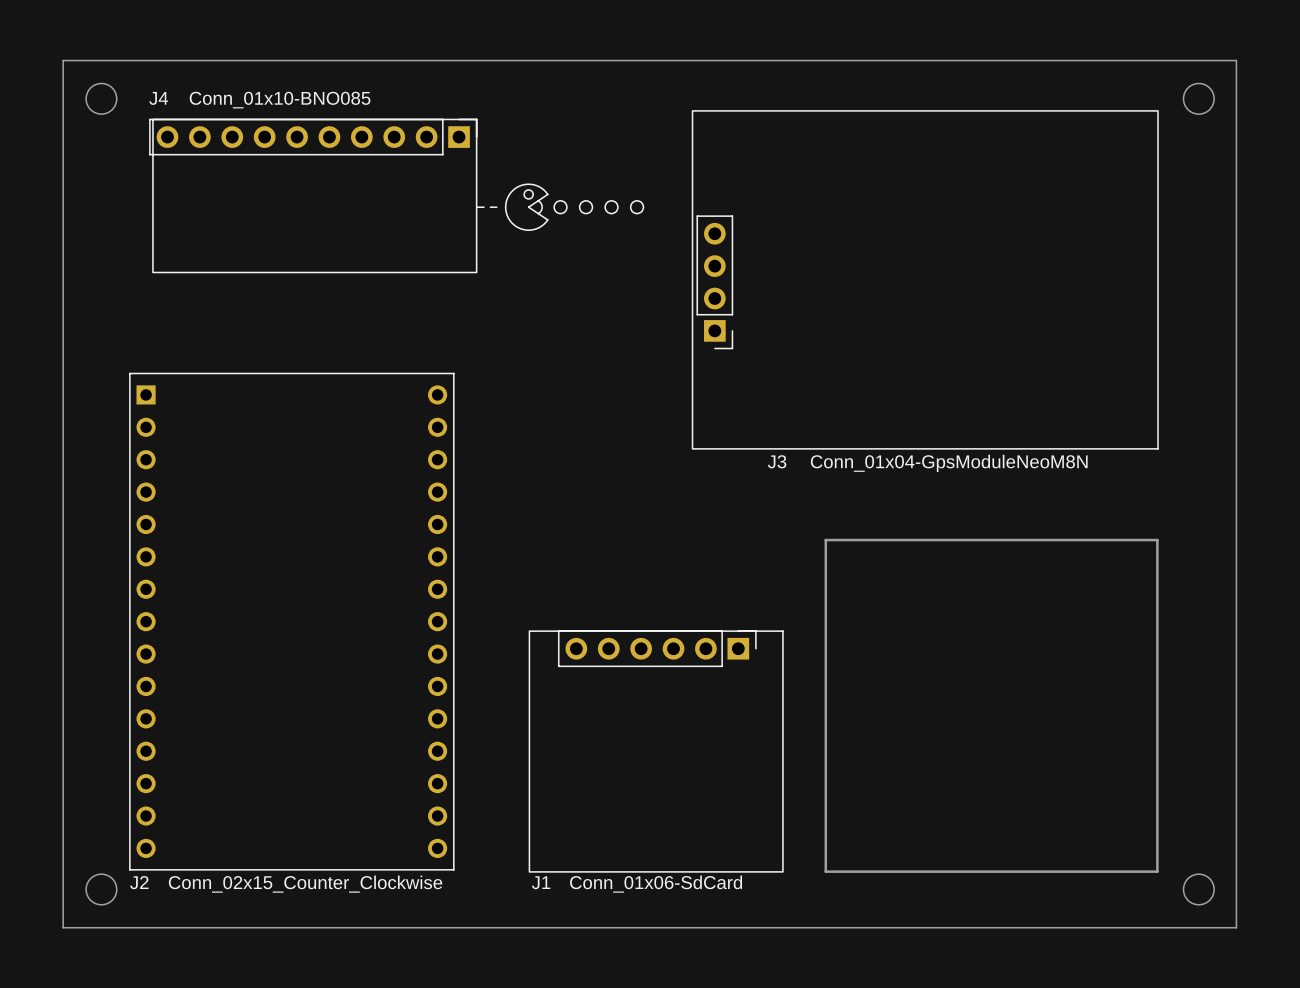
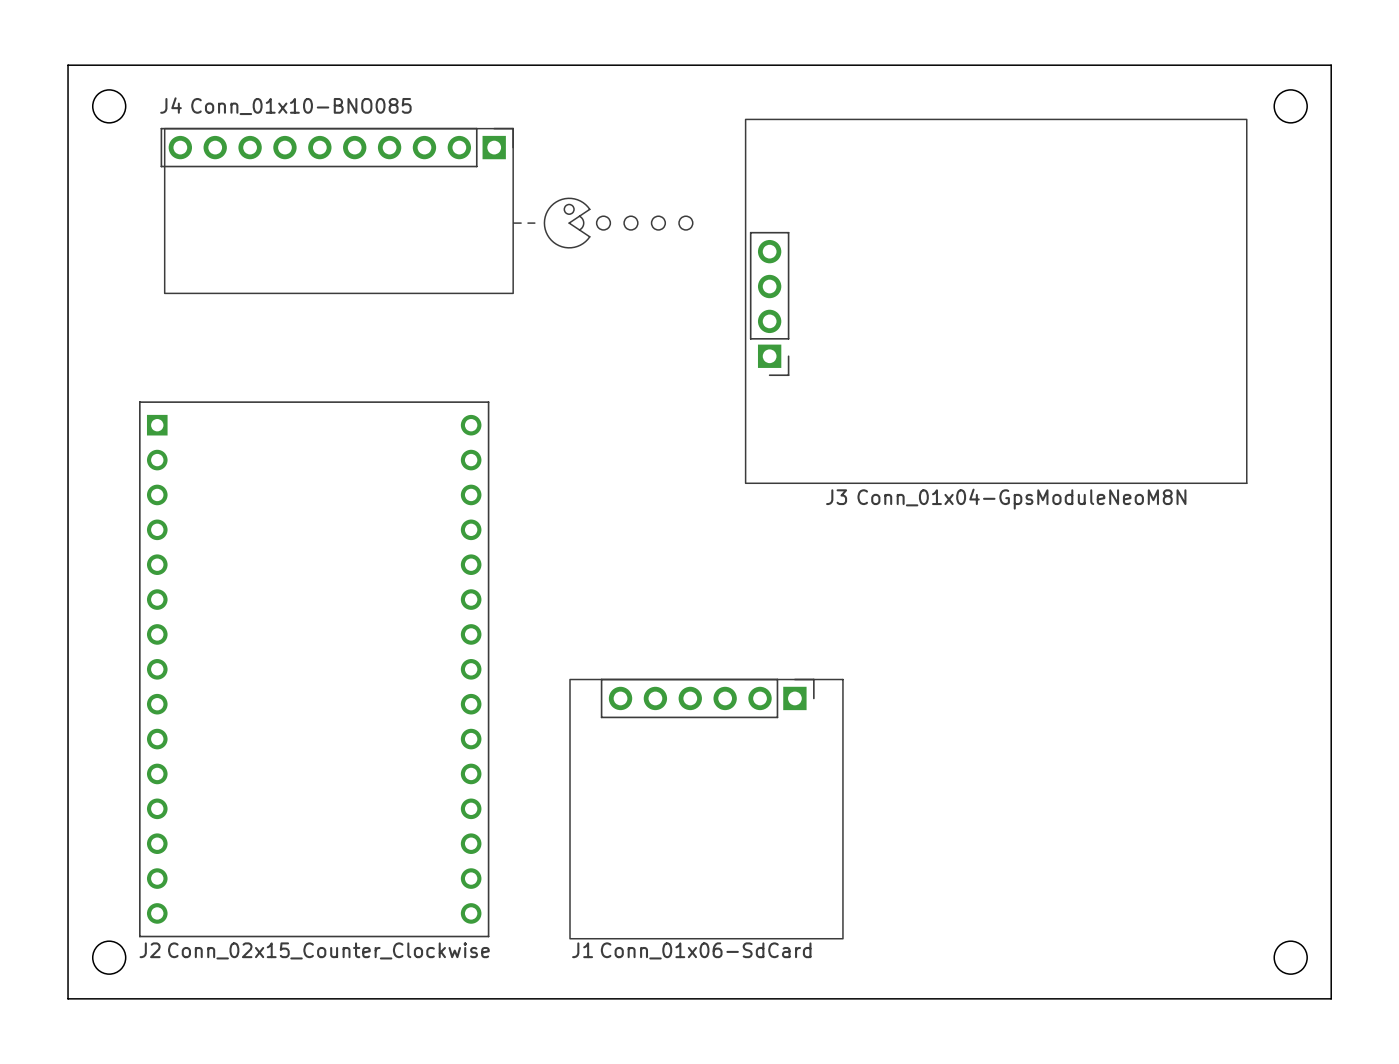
board edge: (825, 540) (1157, 540) (1157, 871) (825, 871) (825, 540) -> none

